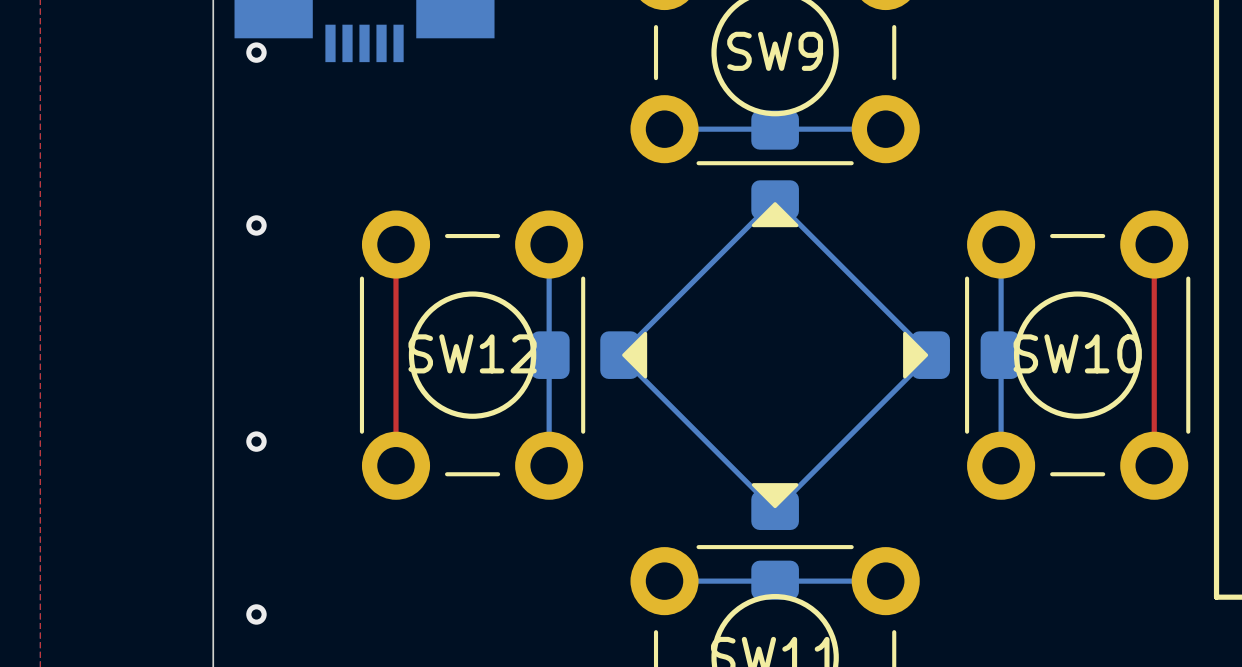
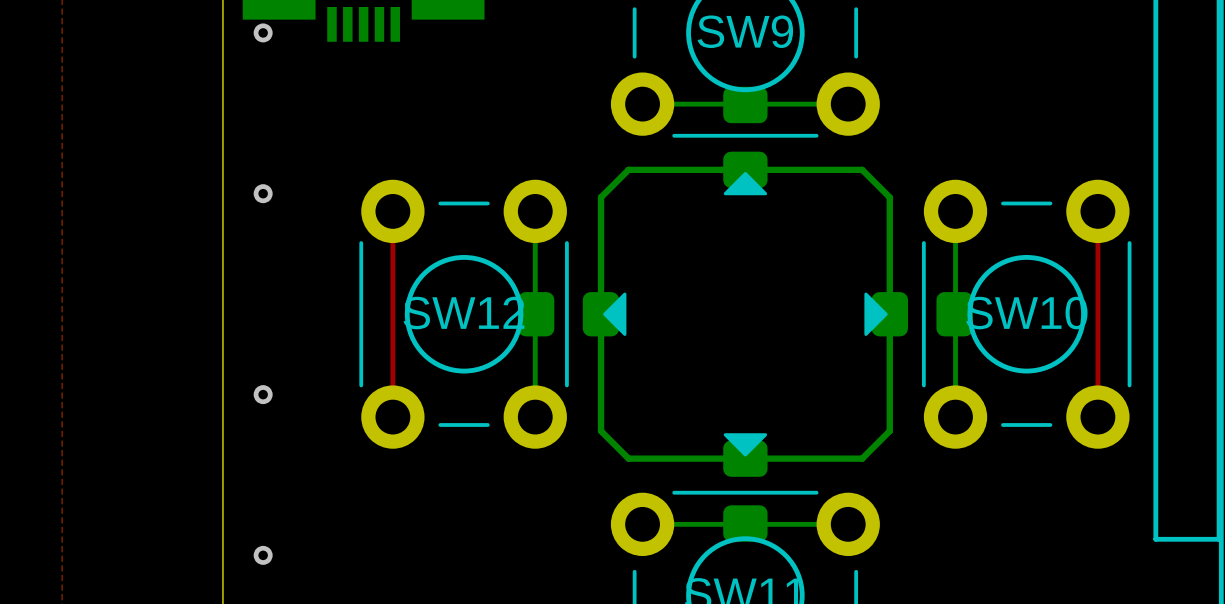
bottom track: (775, 199) (930, 355) (775, 510) (619, 355) (775, 199) -> (628, 169) (601, 197) (601, 431) (628, 458) (862, 458) (889, 431) (889, 197) (862, 169) (628, 169)

